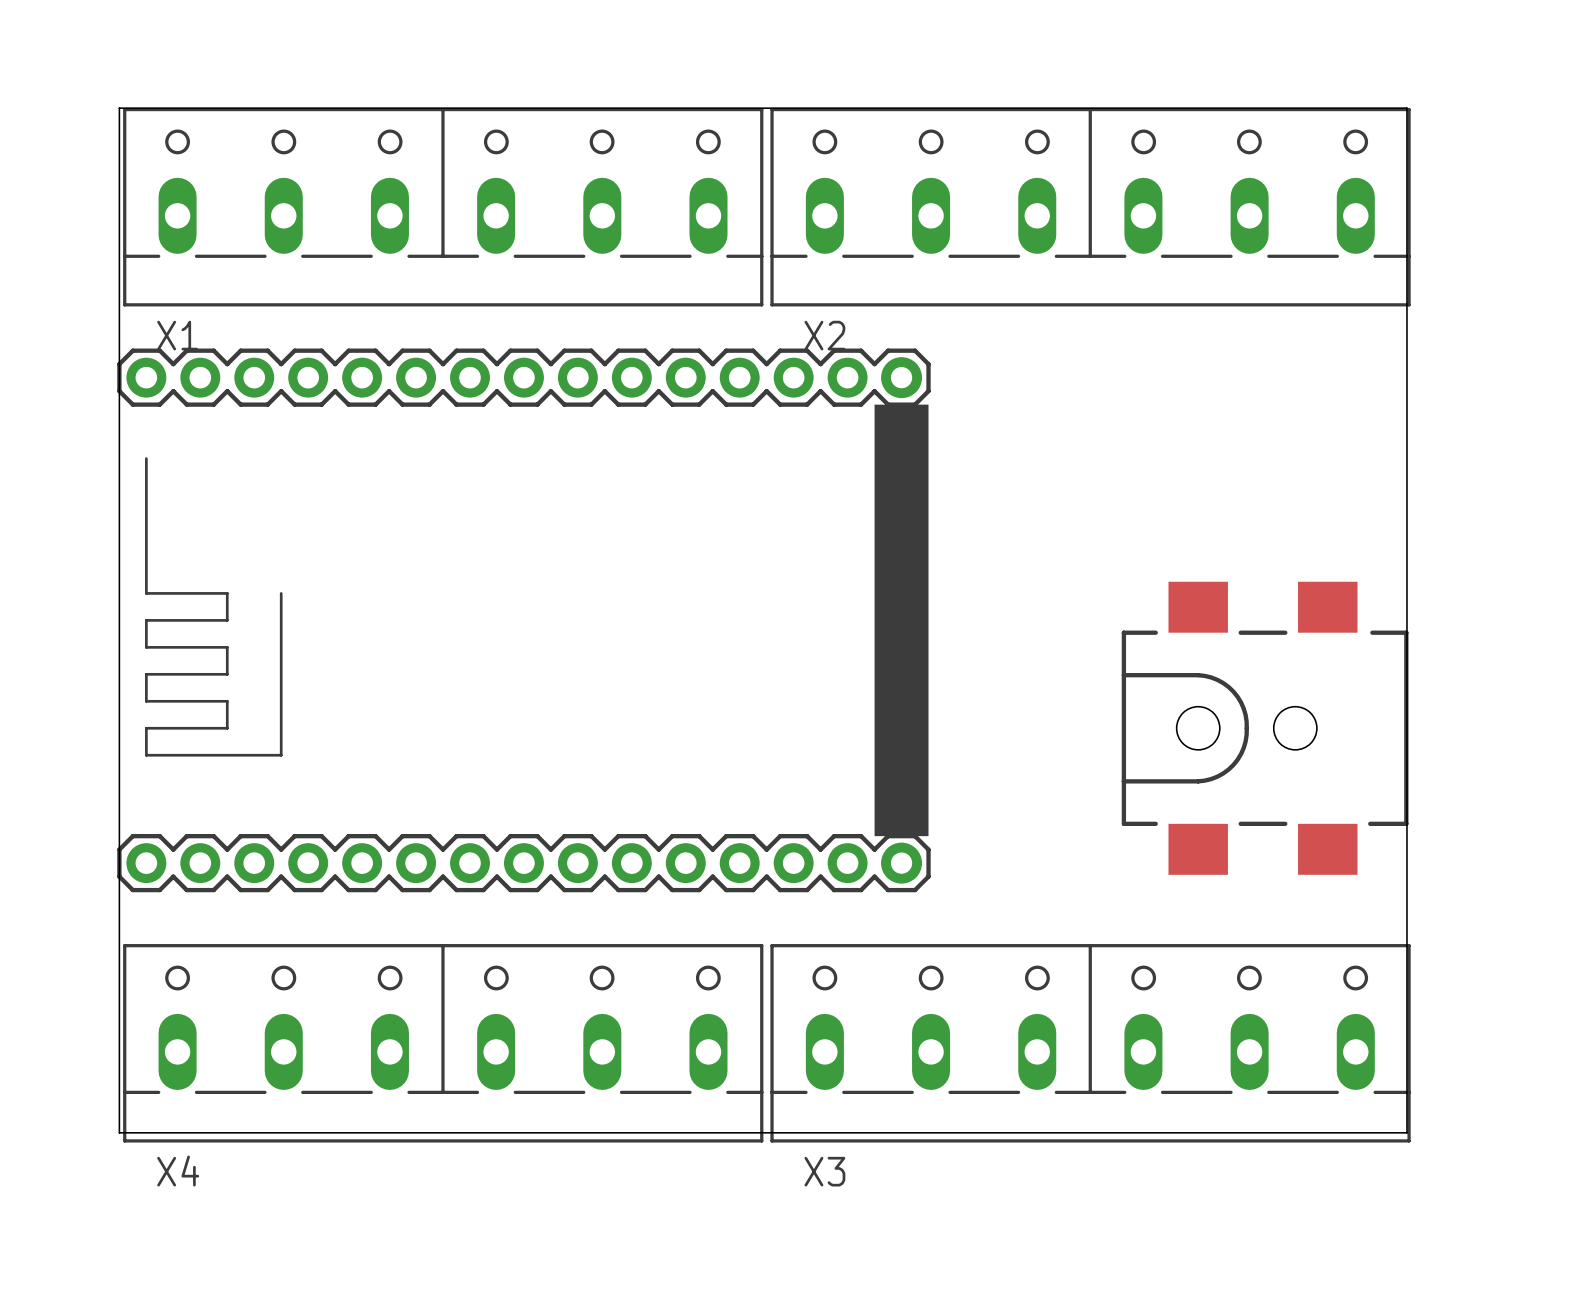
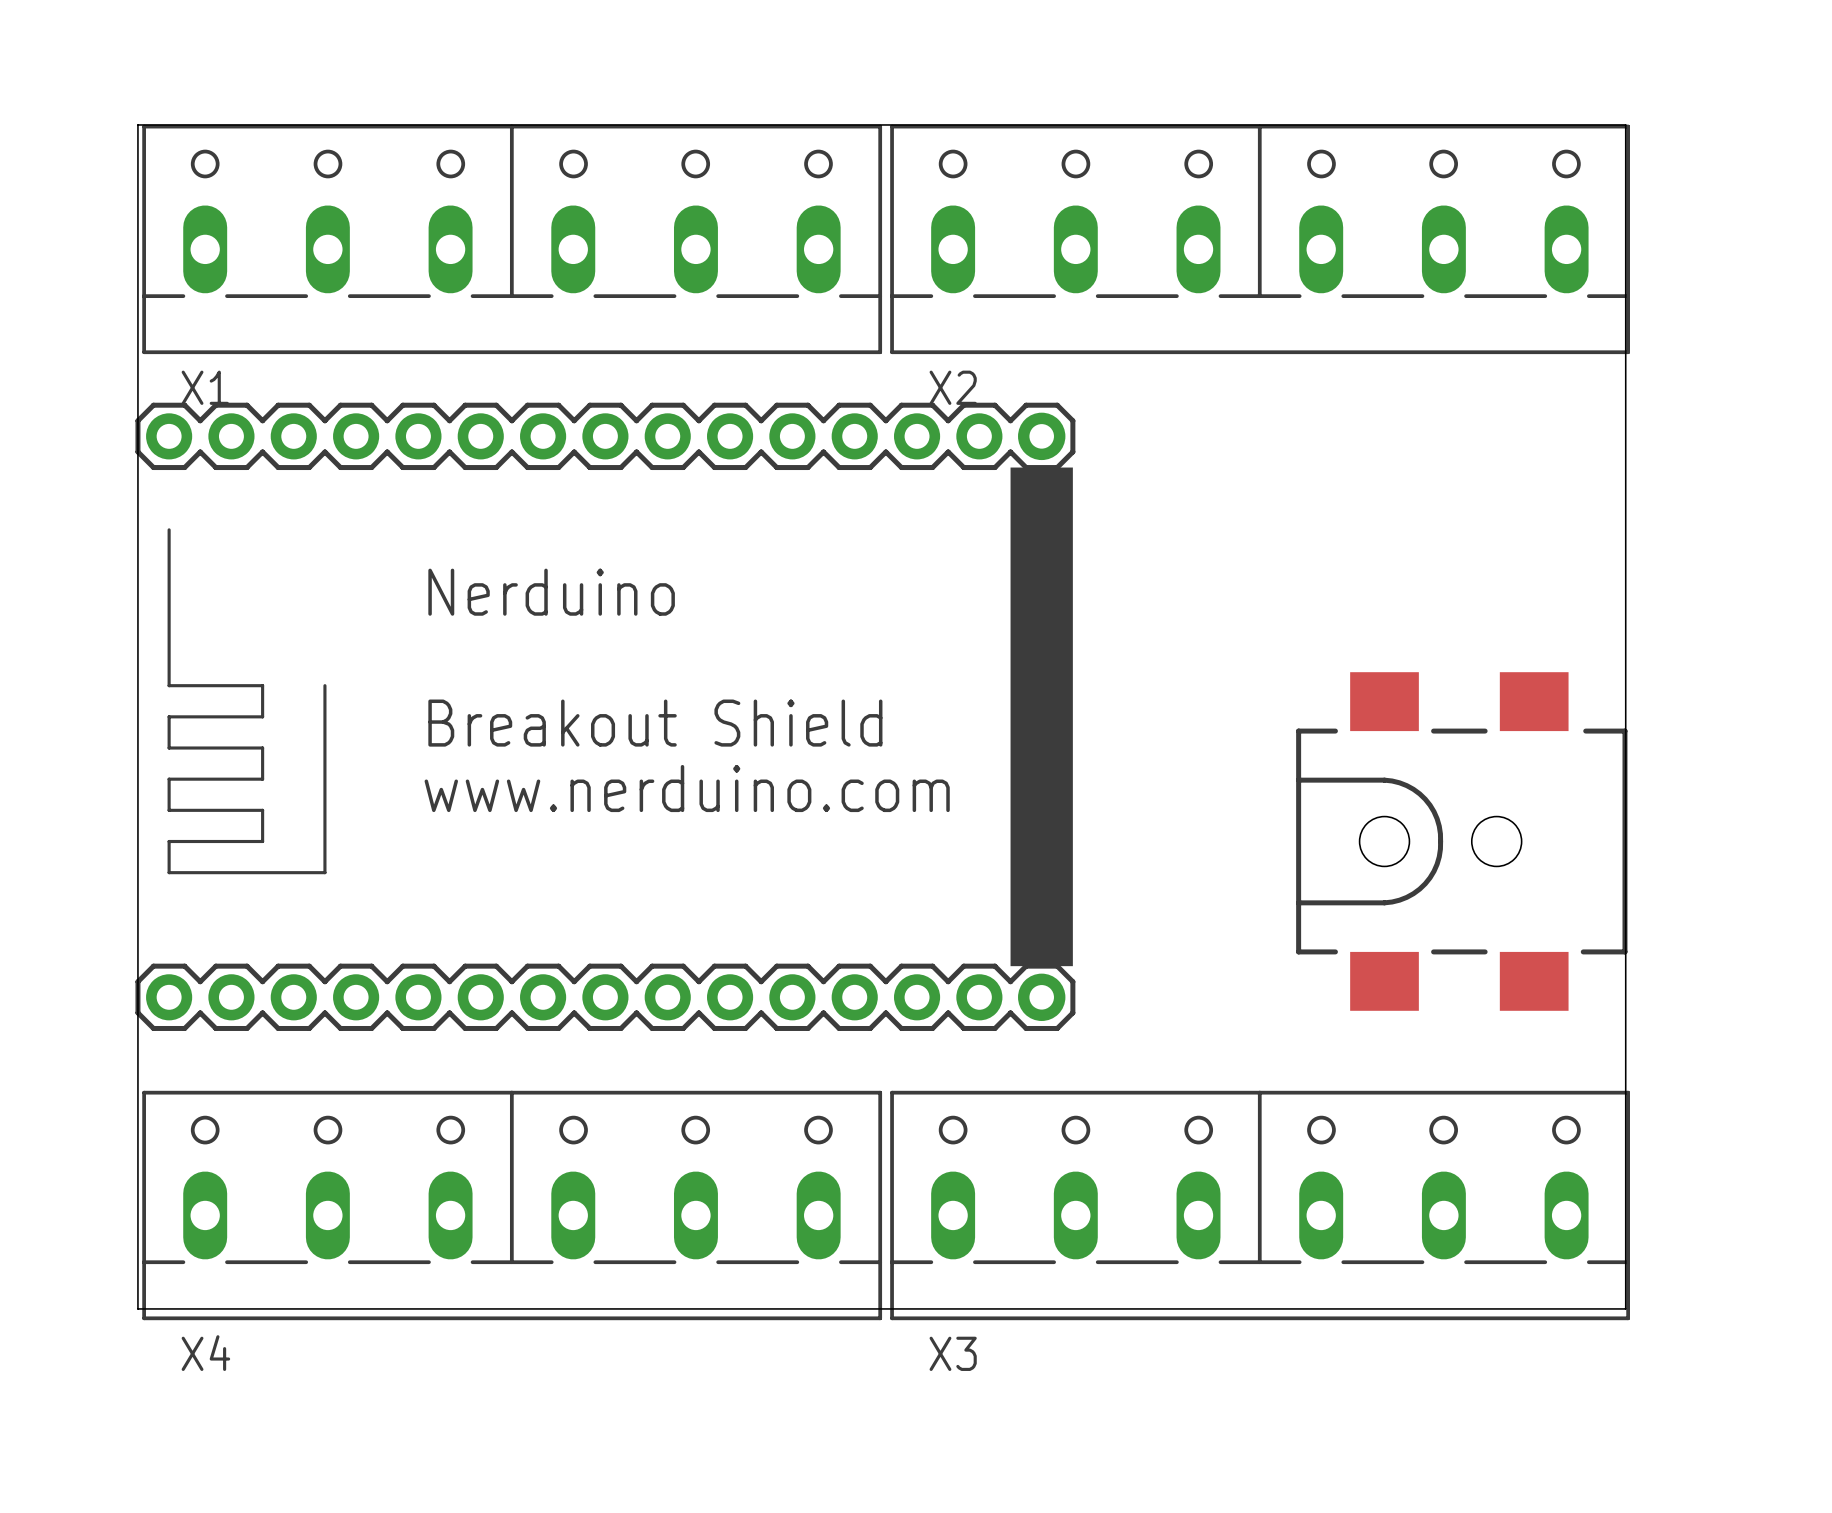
text: none -> Nerduino (551, 592)
text: none -> Breakout Shield (655, 723)
text: none -> www.nerduino.com (687, 788)

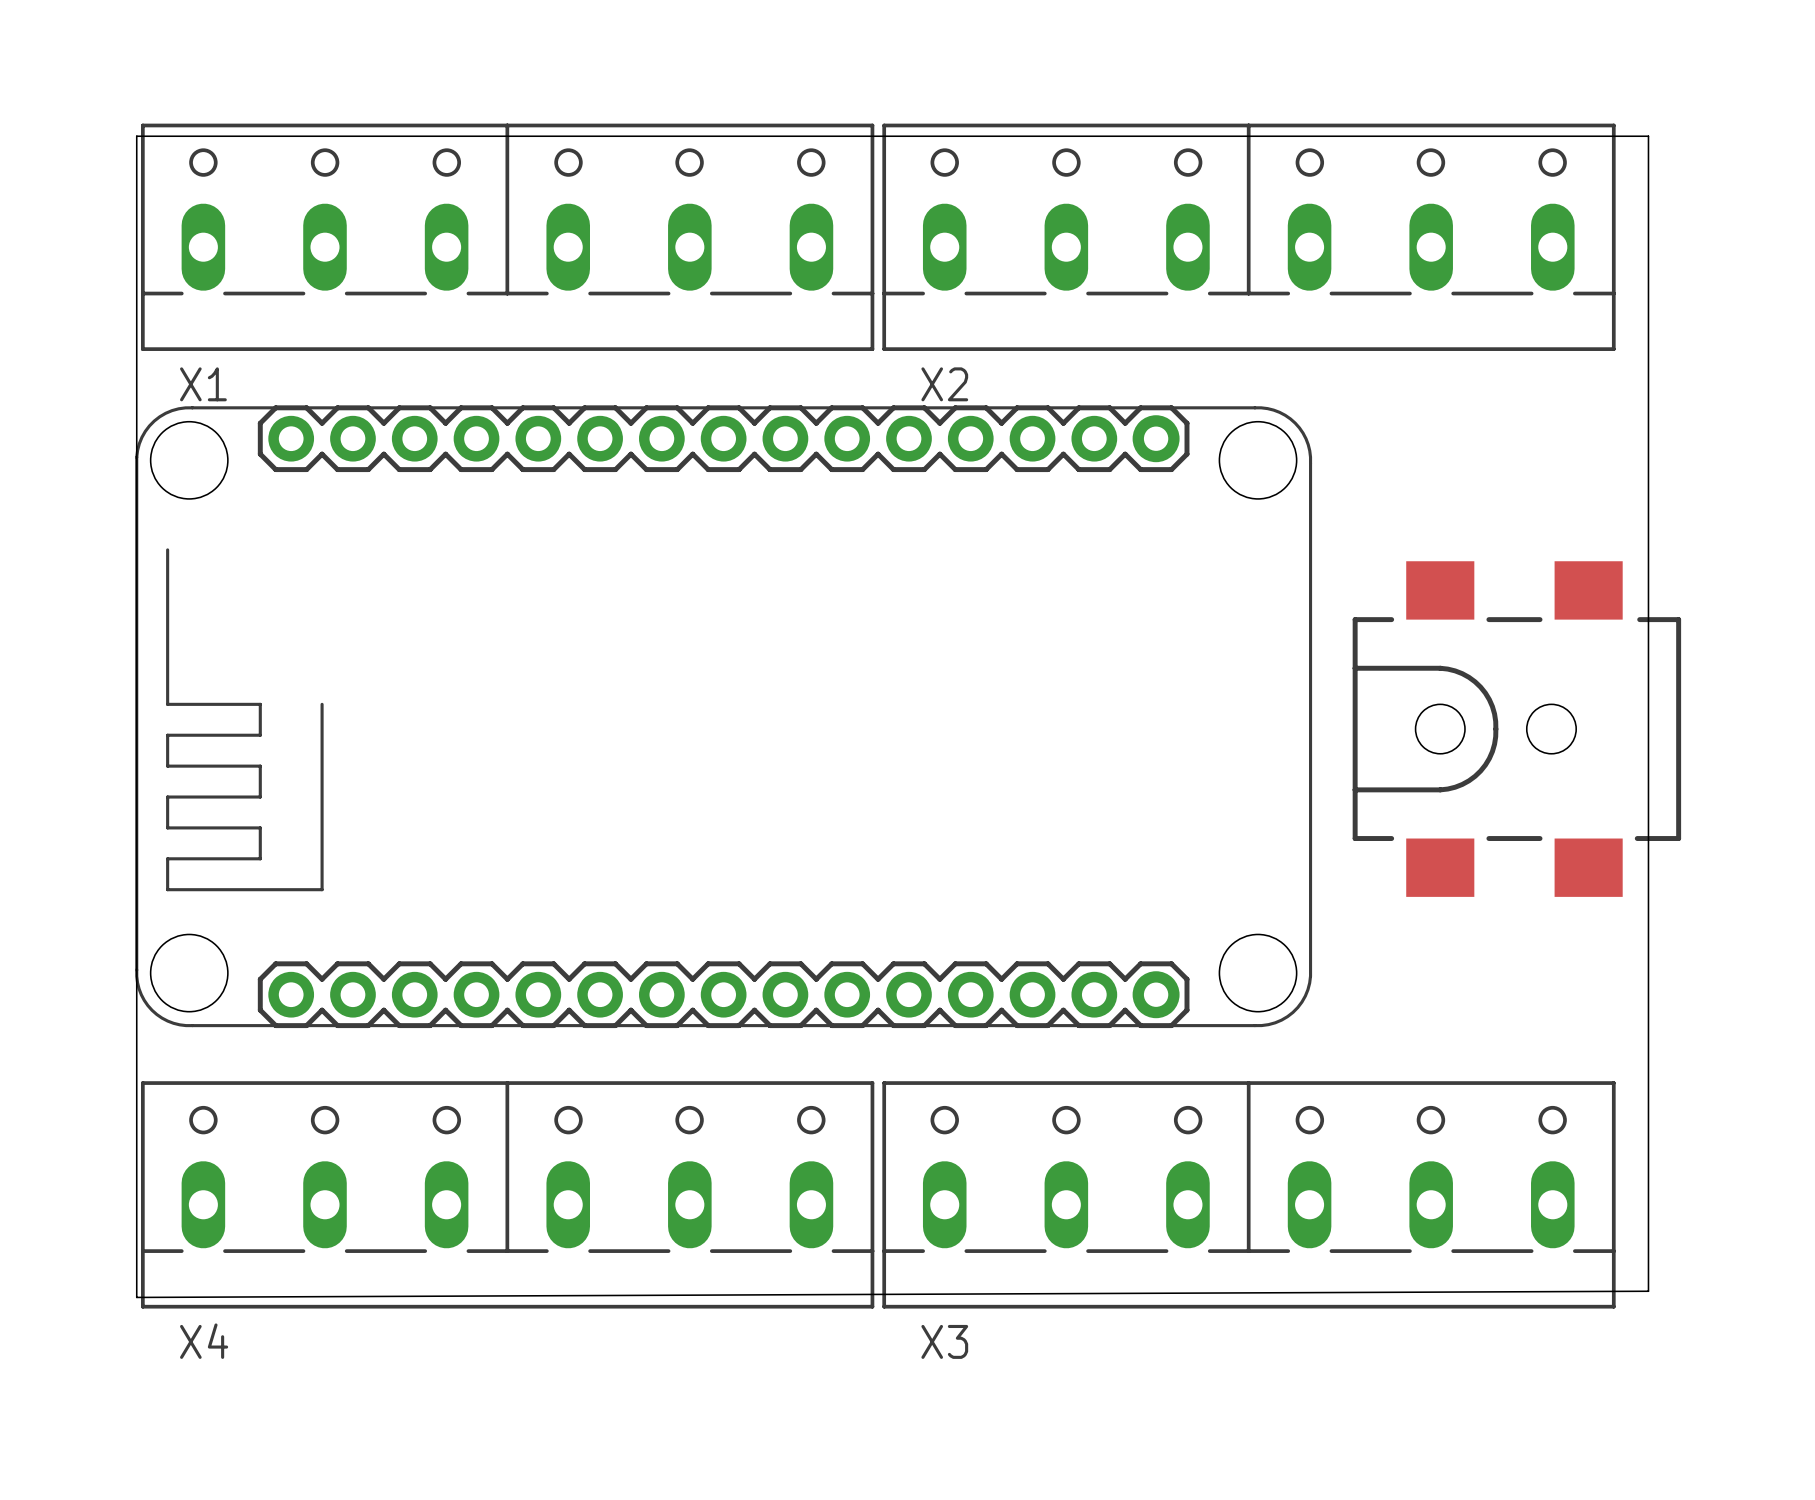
board edge: (137, 137) (137, 124) (1625, 124) (1625, 1308) (137, 1308) -> (136, 136) (1648, 136) (1648, 1291) (136, 1297)
text: Nerduino (551, 592) -> none
part: (605, 716) -> none
text: Breakout Shield (655, 723) -> none
part: none -> (723, 716)
text: www.nerduino.com (687, 788) -> none
part position: (1461, 841) -> (1516, 729)

